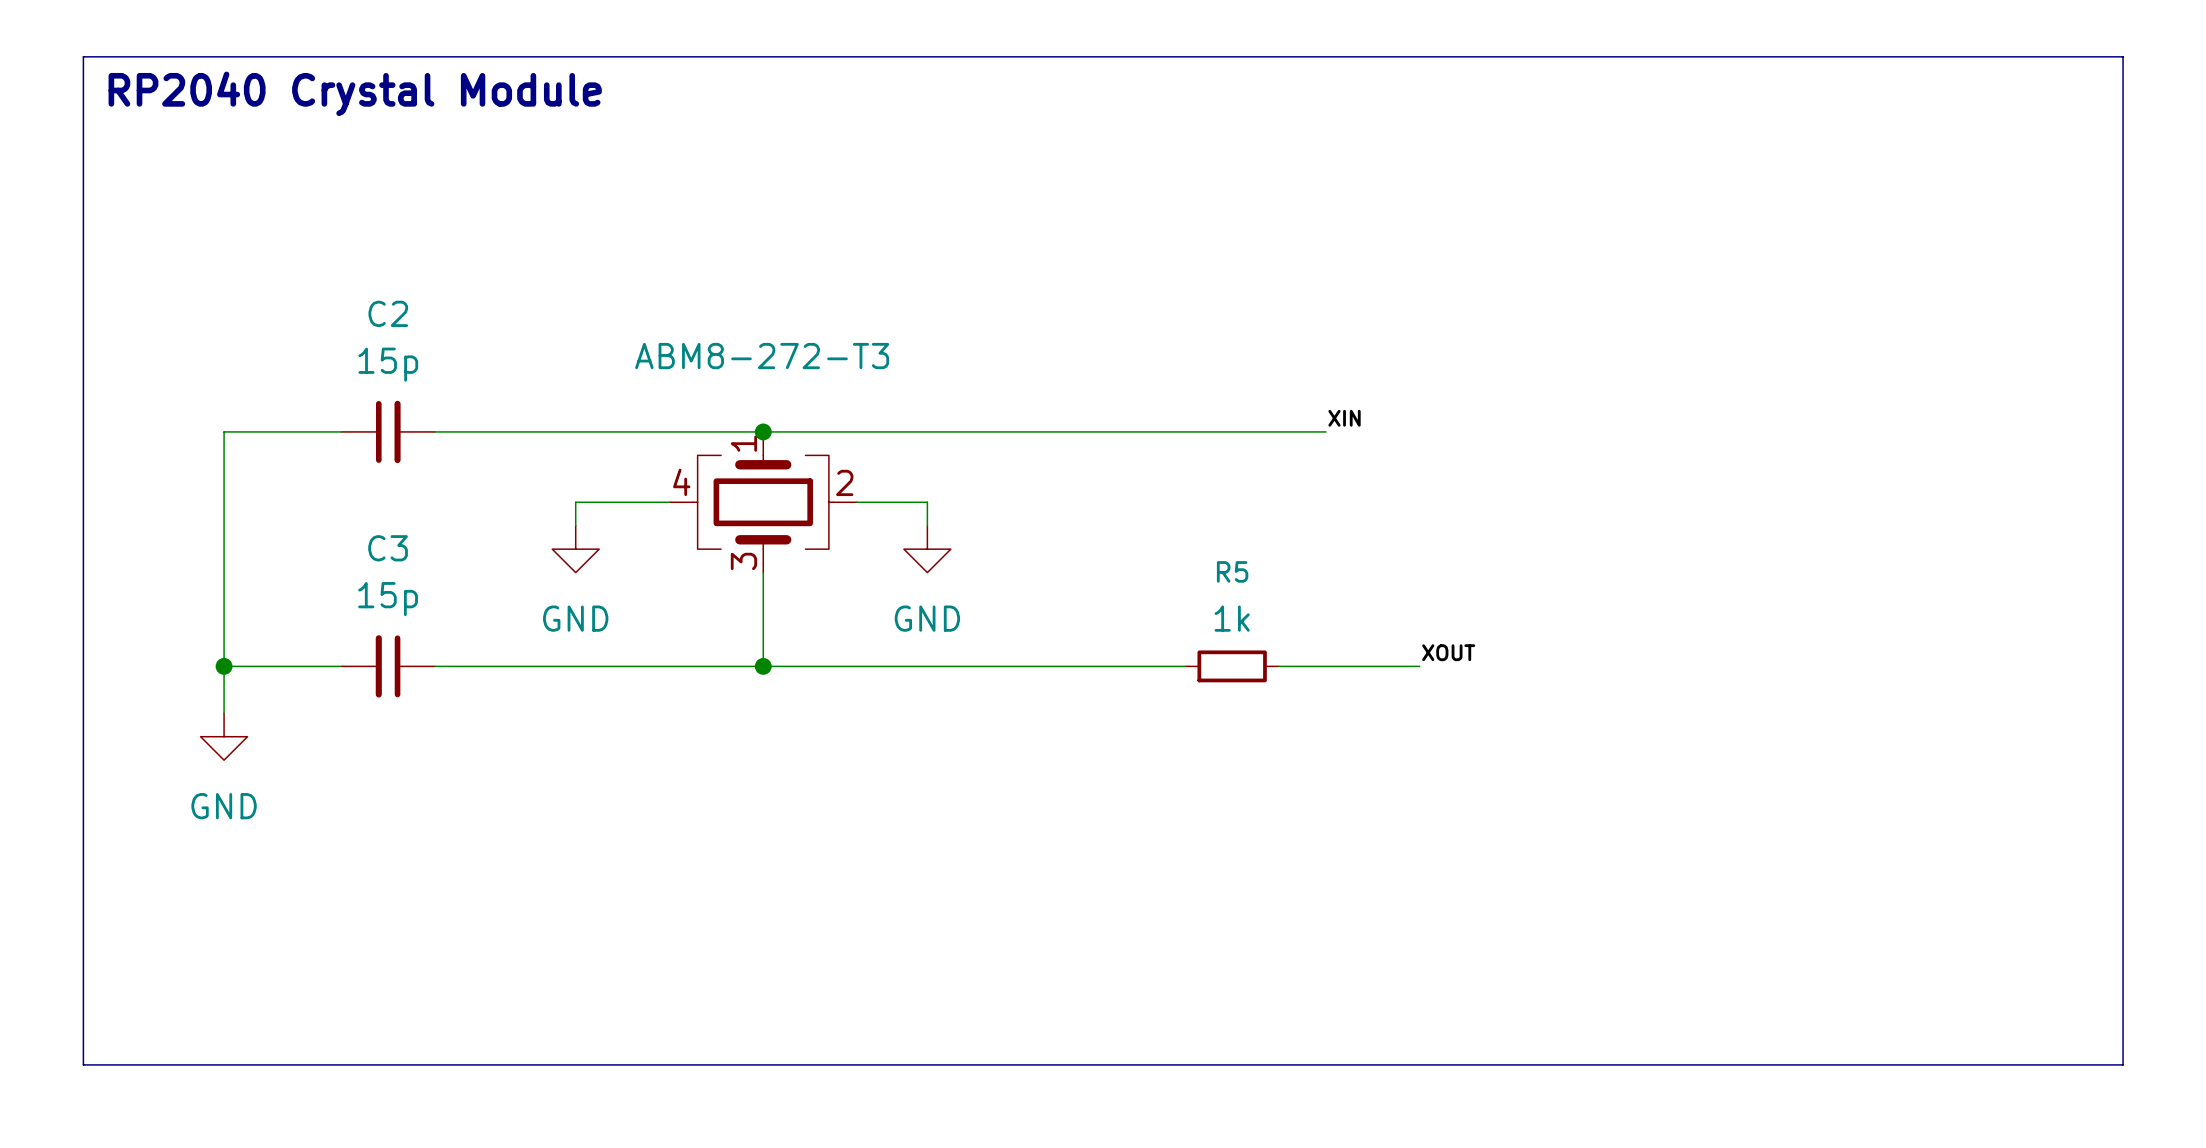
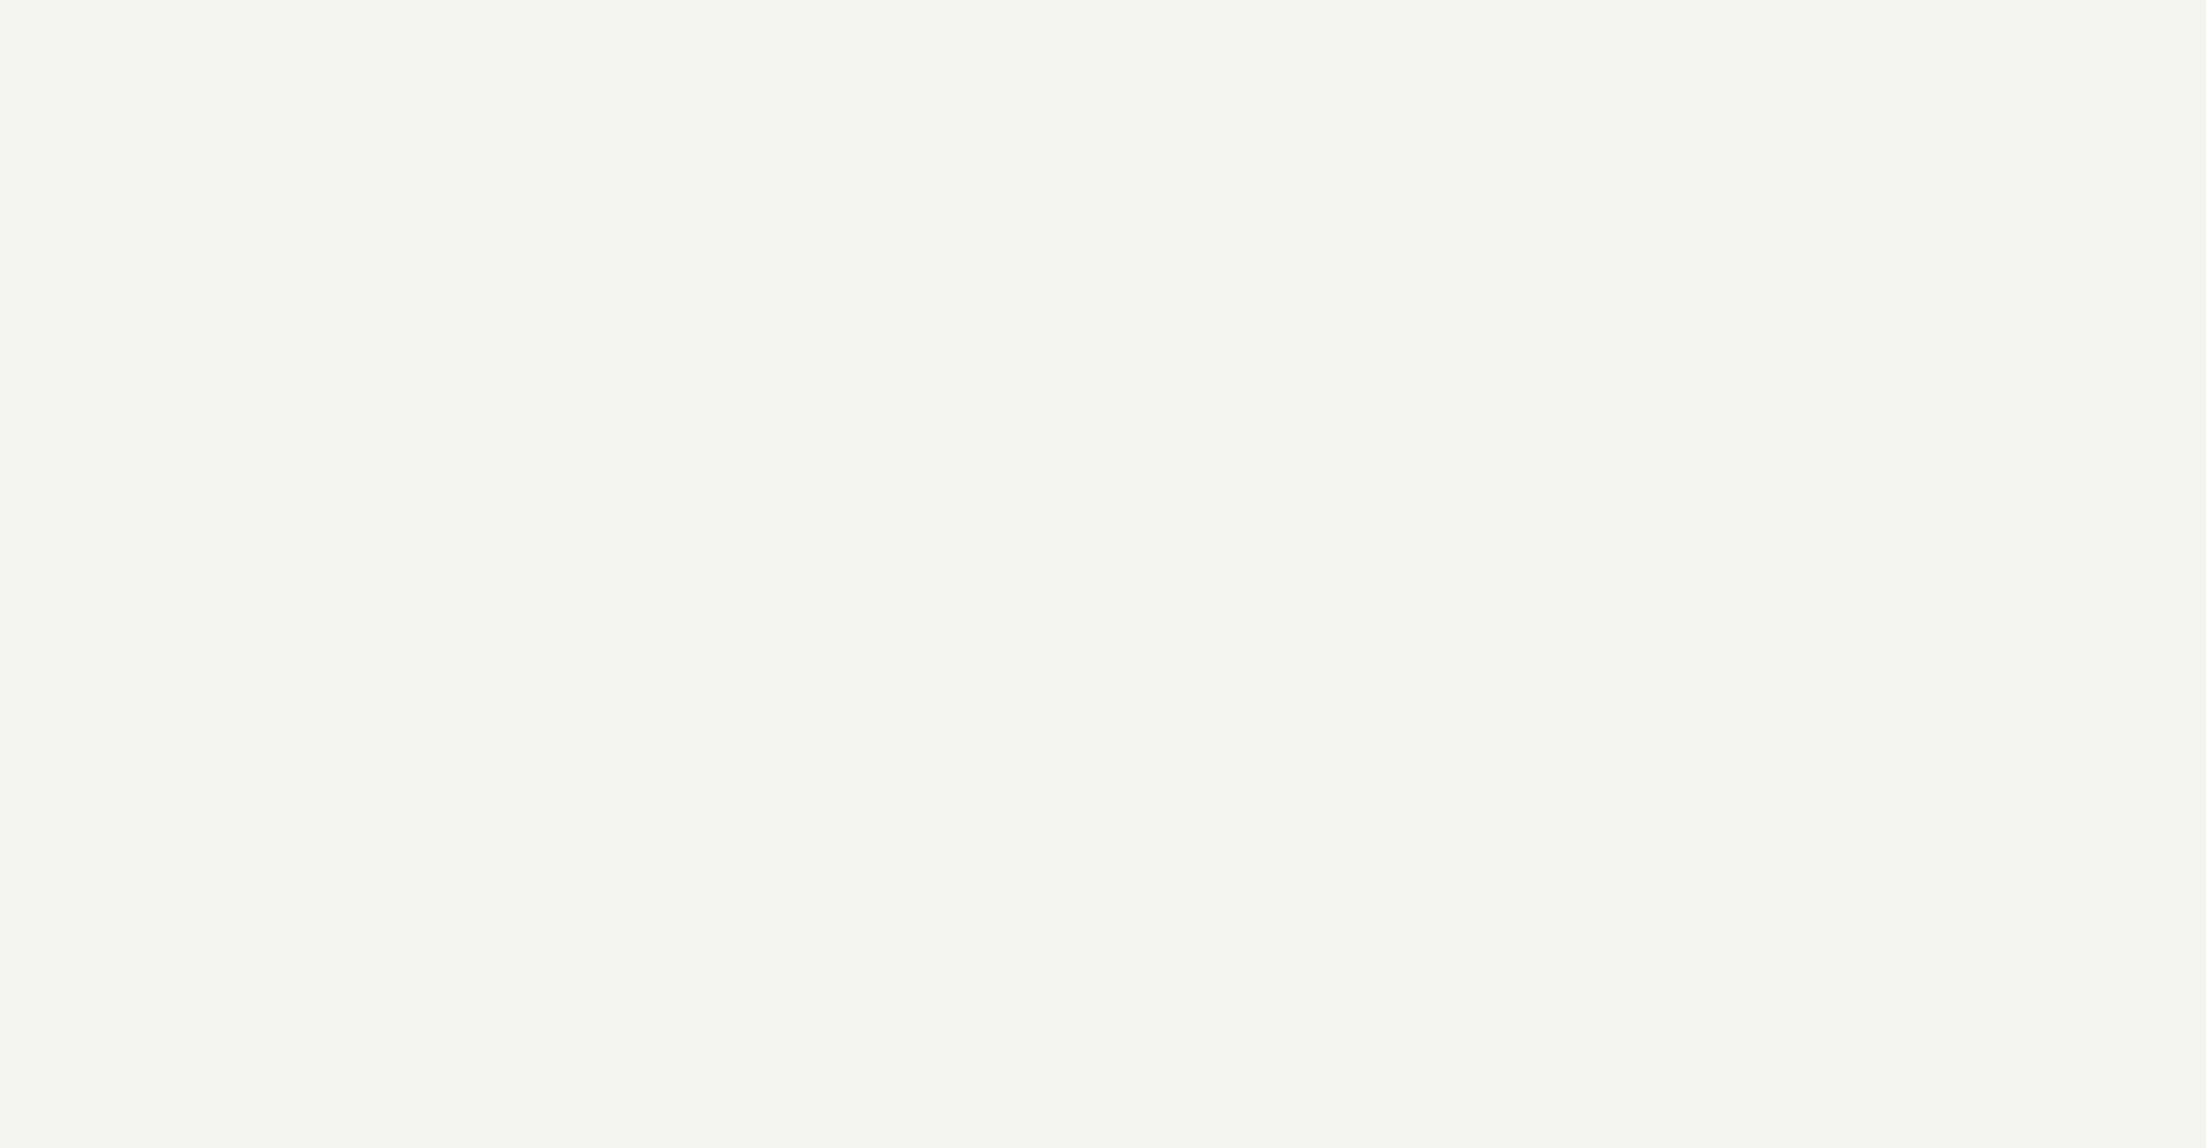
line: (83, 56) (2123, 56) (2123, 1064) (83, 1064) (83, 56) -> none
text: RP2040 Crystal Module (355, 93) -> none
label: XIN (1344, 418) -> none
wire: (341, 431) (224, 431) (224, 713) -> none
C2: 15p (388, 431) -> none
wire: (435, 431) (1325, 431) -> none
junction: (763, 431) -> none
wire: (669, 502) (575, 502) (575, 525) -> none
part: ABM8-272-T3 (763, 502) -> none
wire: (857, 502) (927, 502) (927, 525) -> none
power symbol: GND (575, 549) -> none
power symbol: GND (927, 549) -> none
wire: (763, 572) (763, 666) -> none
label: XOUT (1448, 652) -> none
wire: (224, 666) (341, 666) -> none
junction: (224, 666) -> none
C3: 15p (388, 666) -> none
wire: (435, 666) (1185, 666) -> none
junction: (763, 666) -> none
R5: 1k (1232, 666) -> none
wire: (1279, 666) (1419, 666) -> none
power symbol: GND (224, 736) -> none

